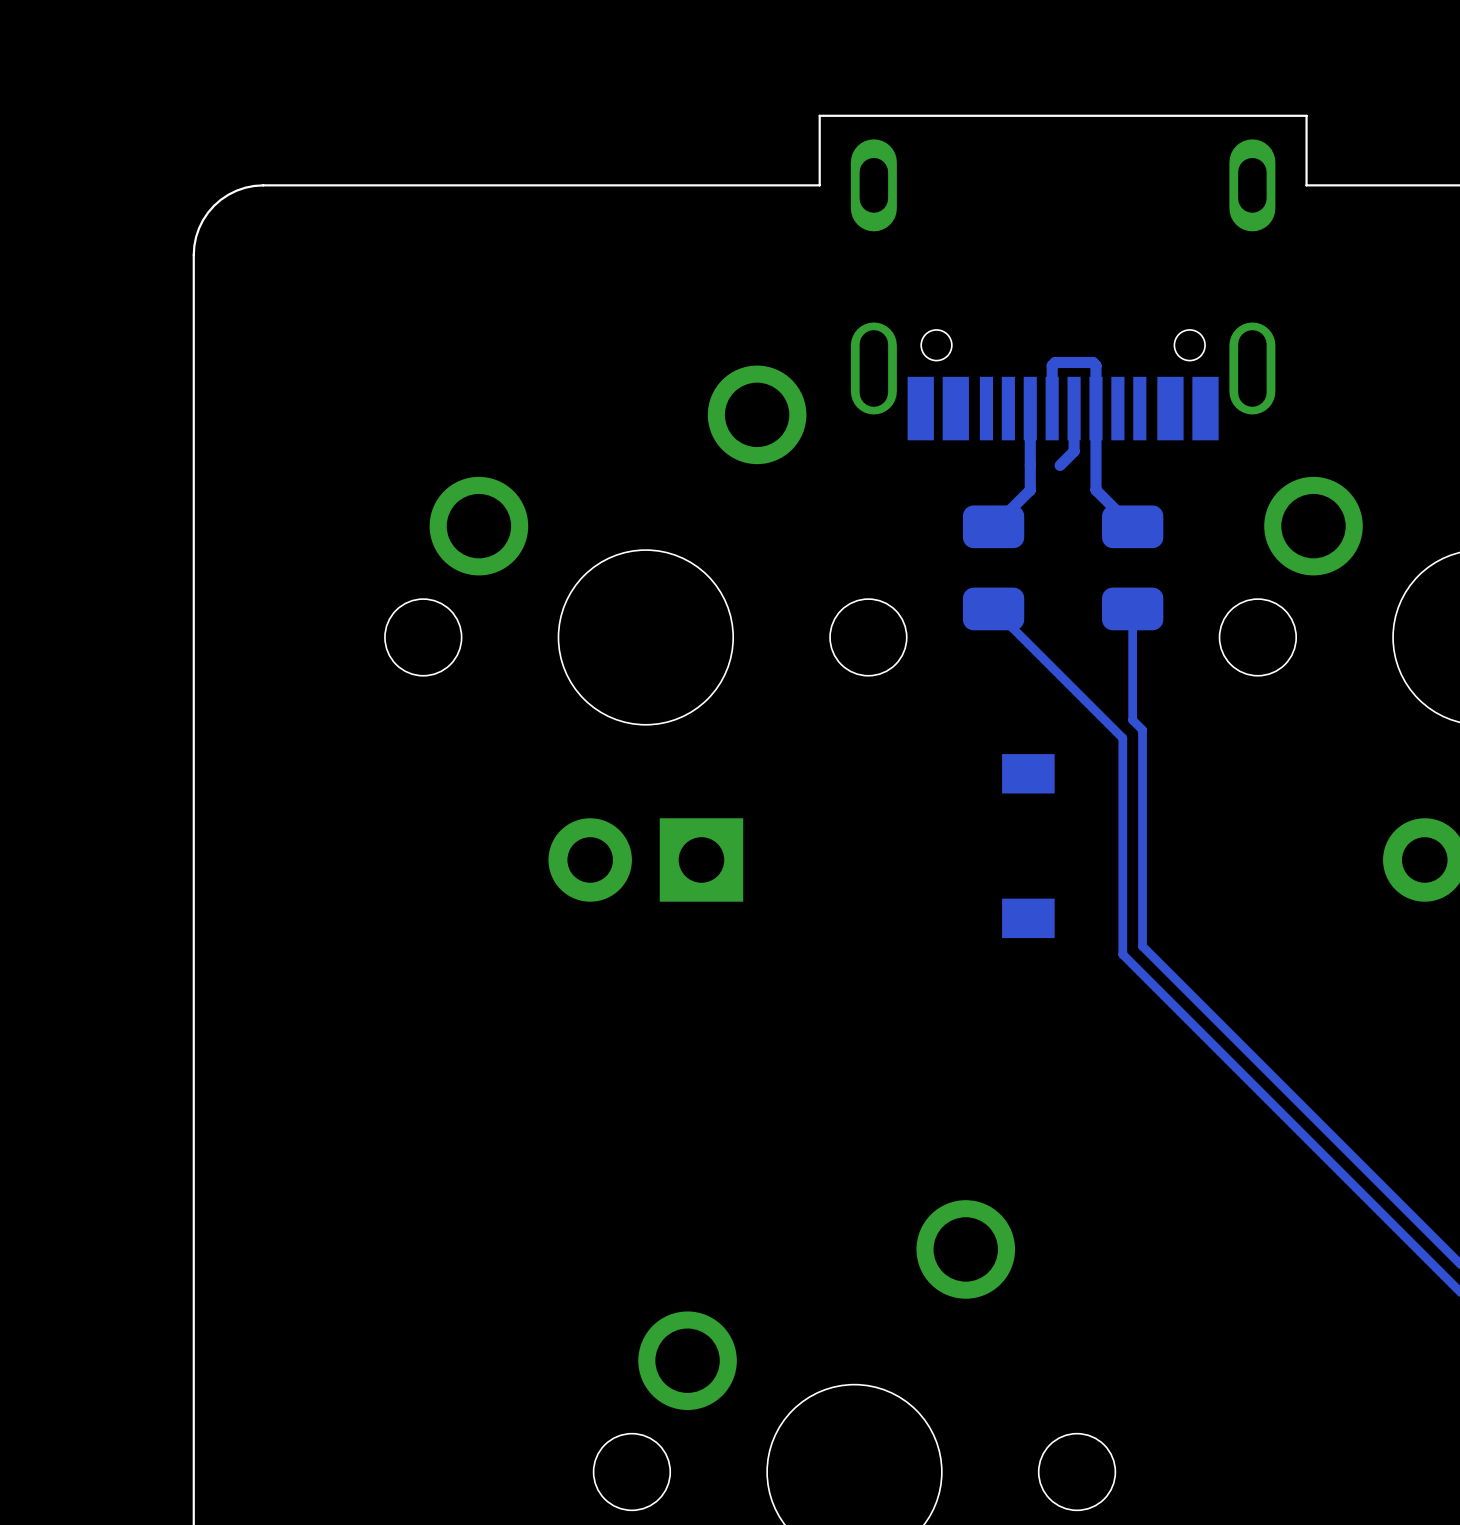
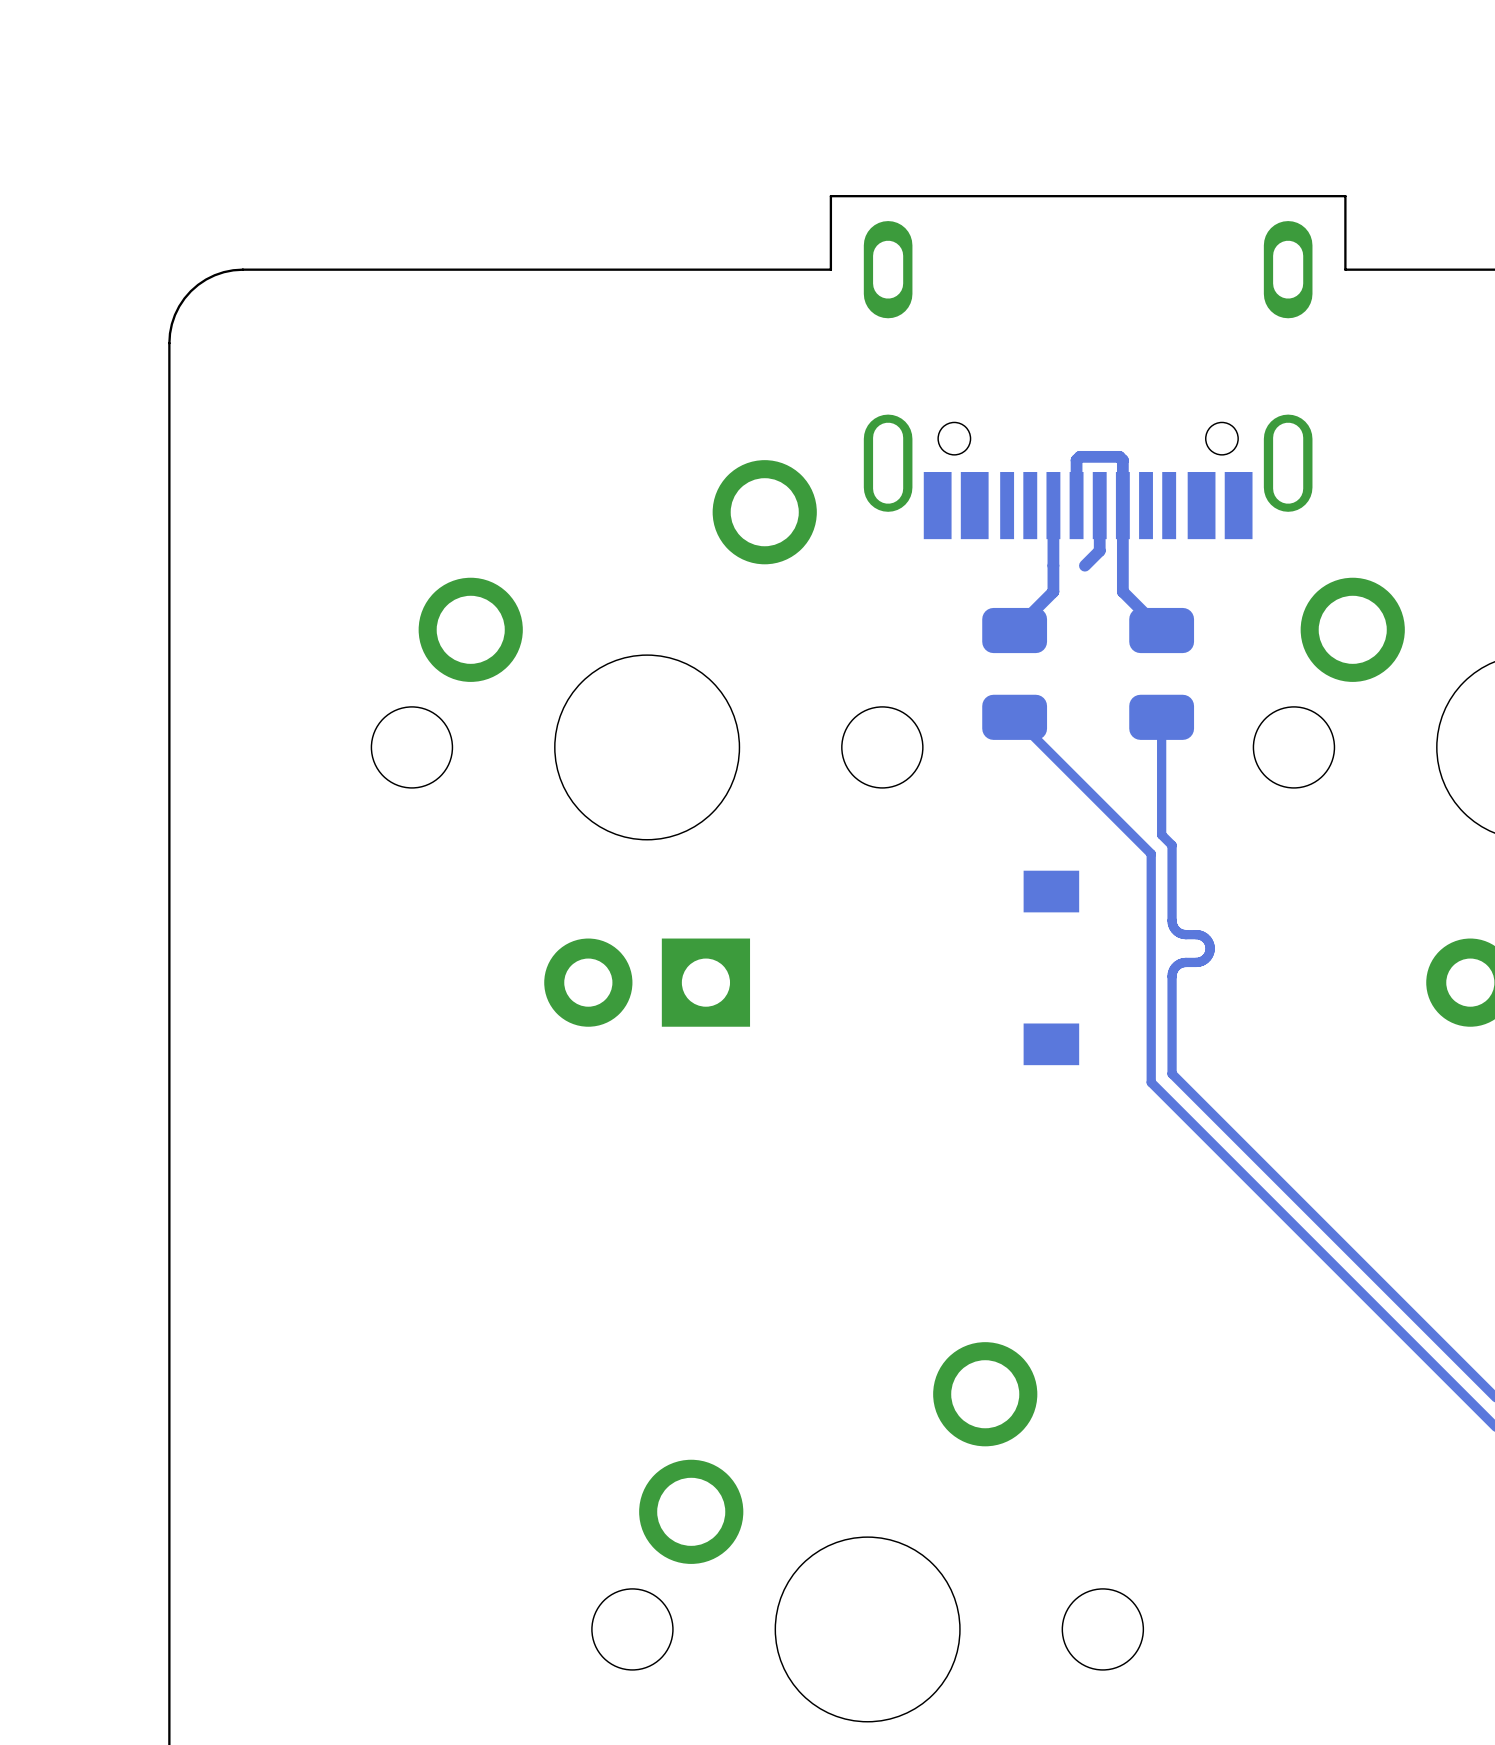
bottom track: (1142, 801) (1142, 854) -> (1172, 920) (1173, 926) (1179, 933) (1199, 935) (1204, 937) (1210, 948) (1208, 954) (1202, 961) (1182, 962) (1177, 965) (1172, 976)

